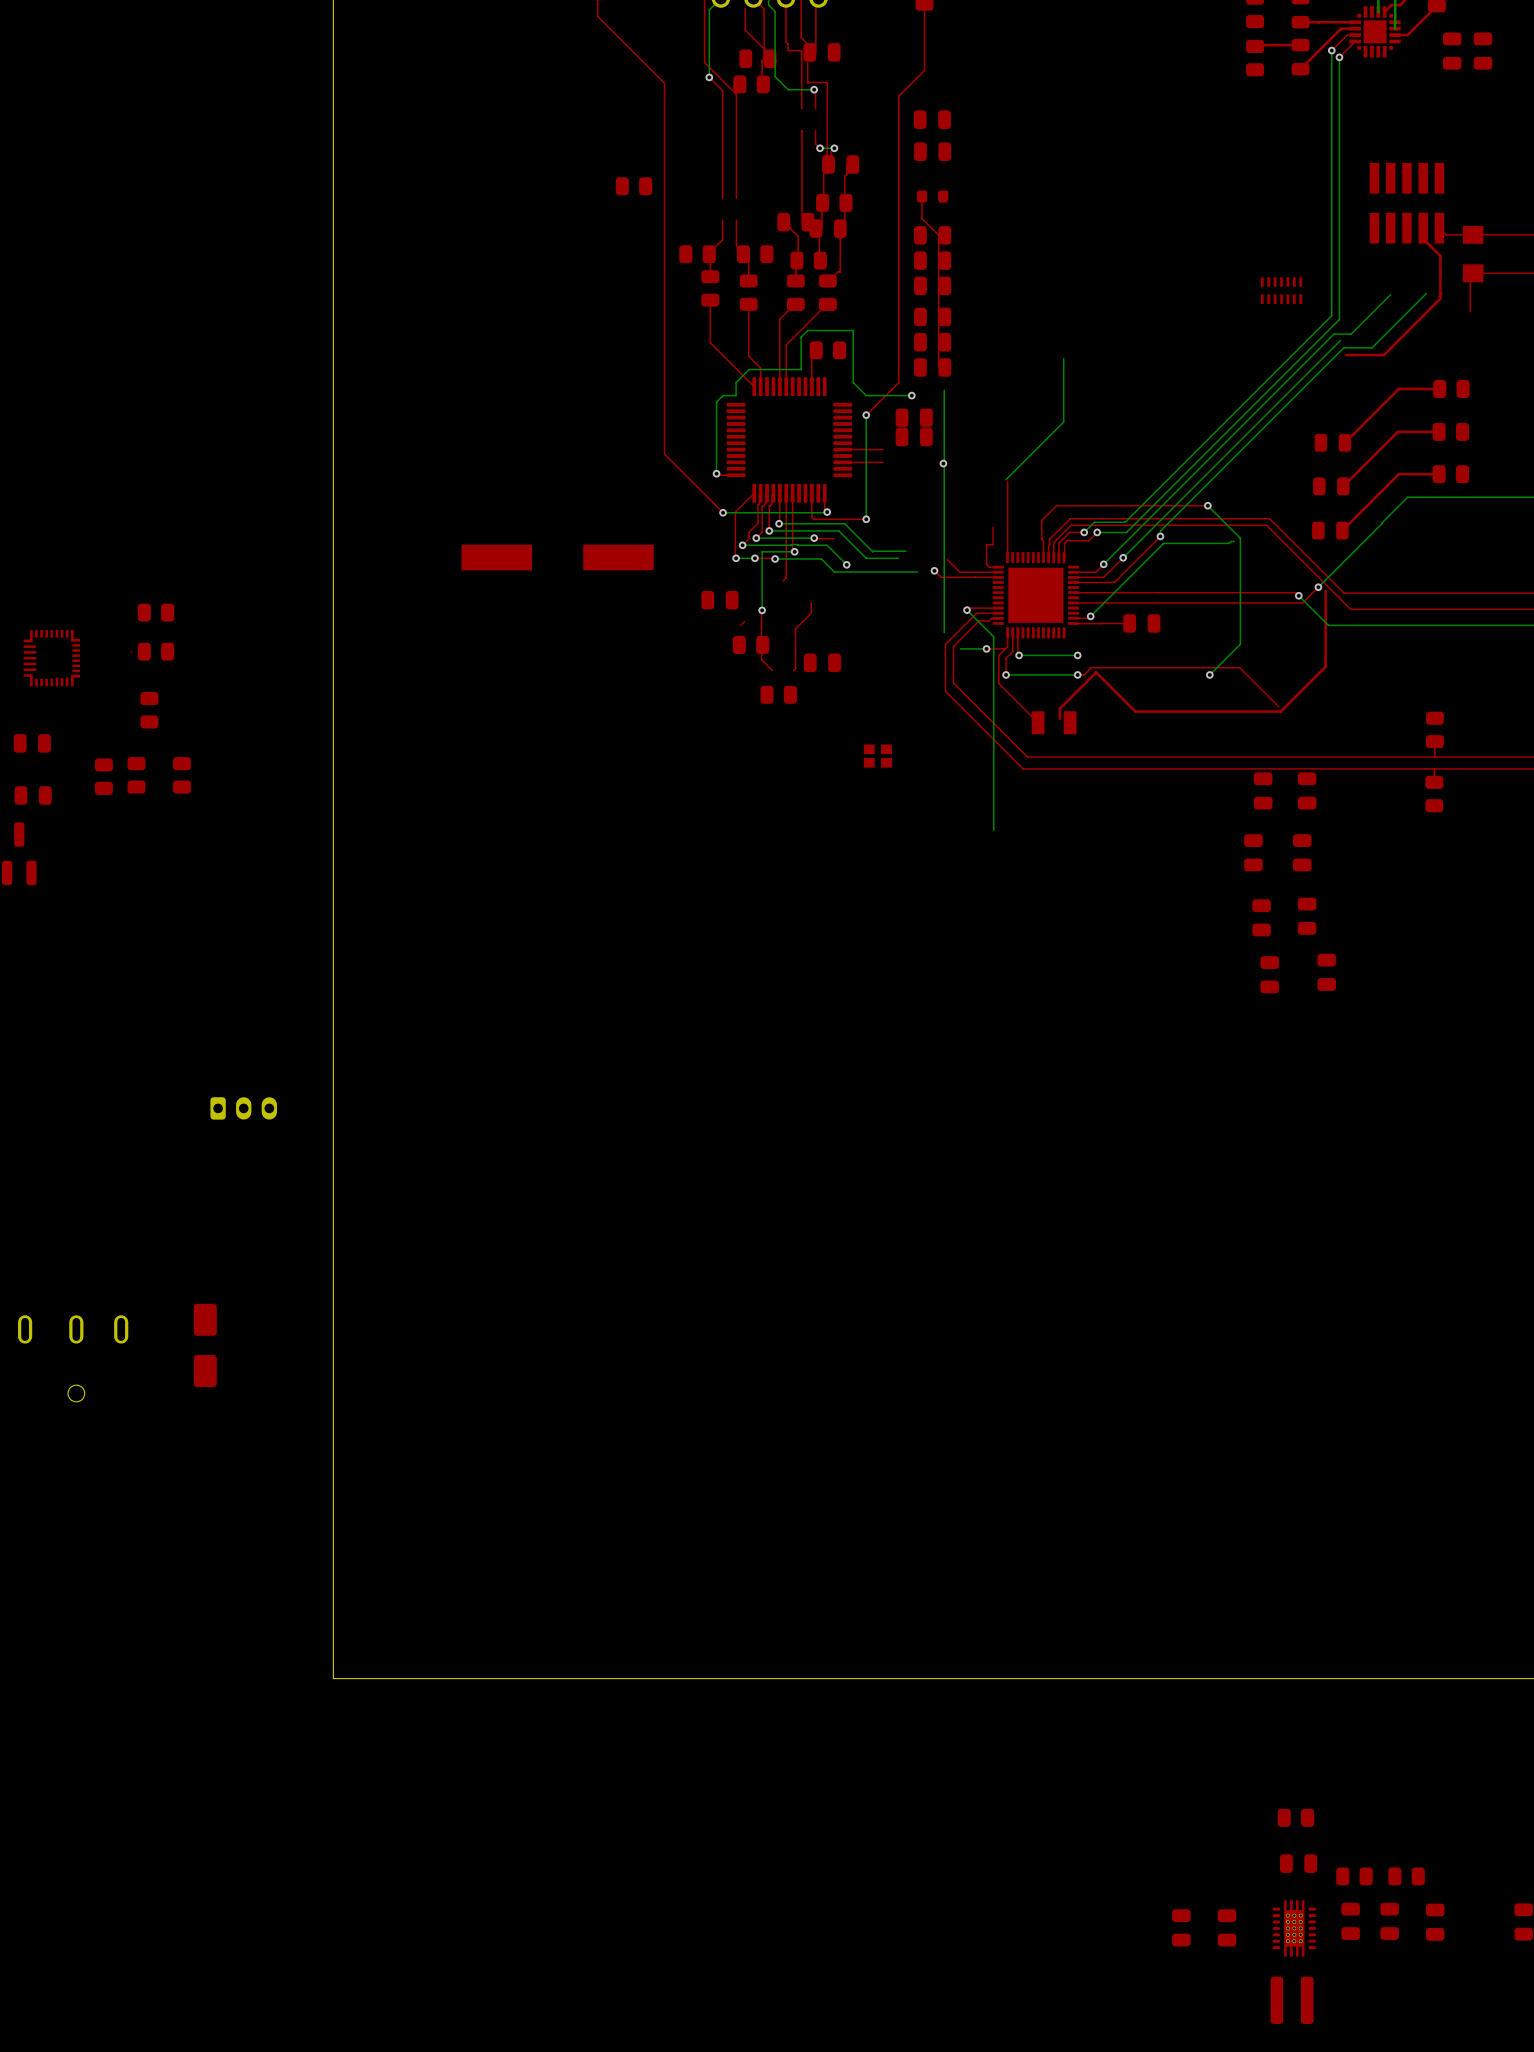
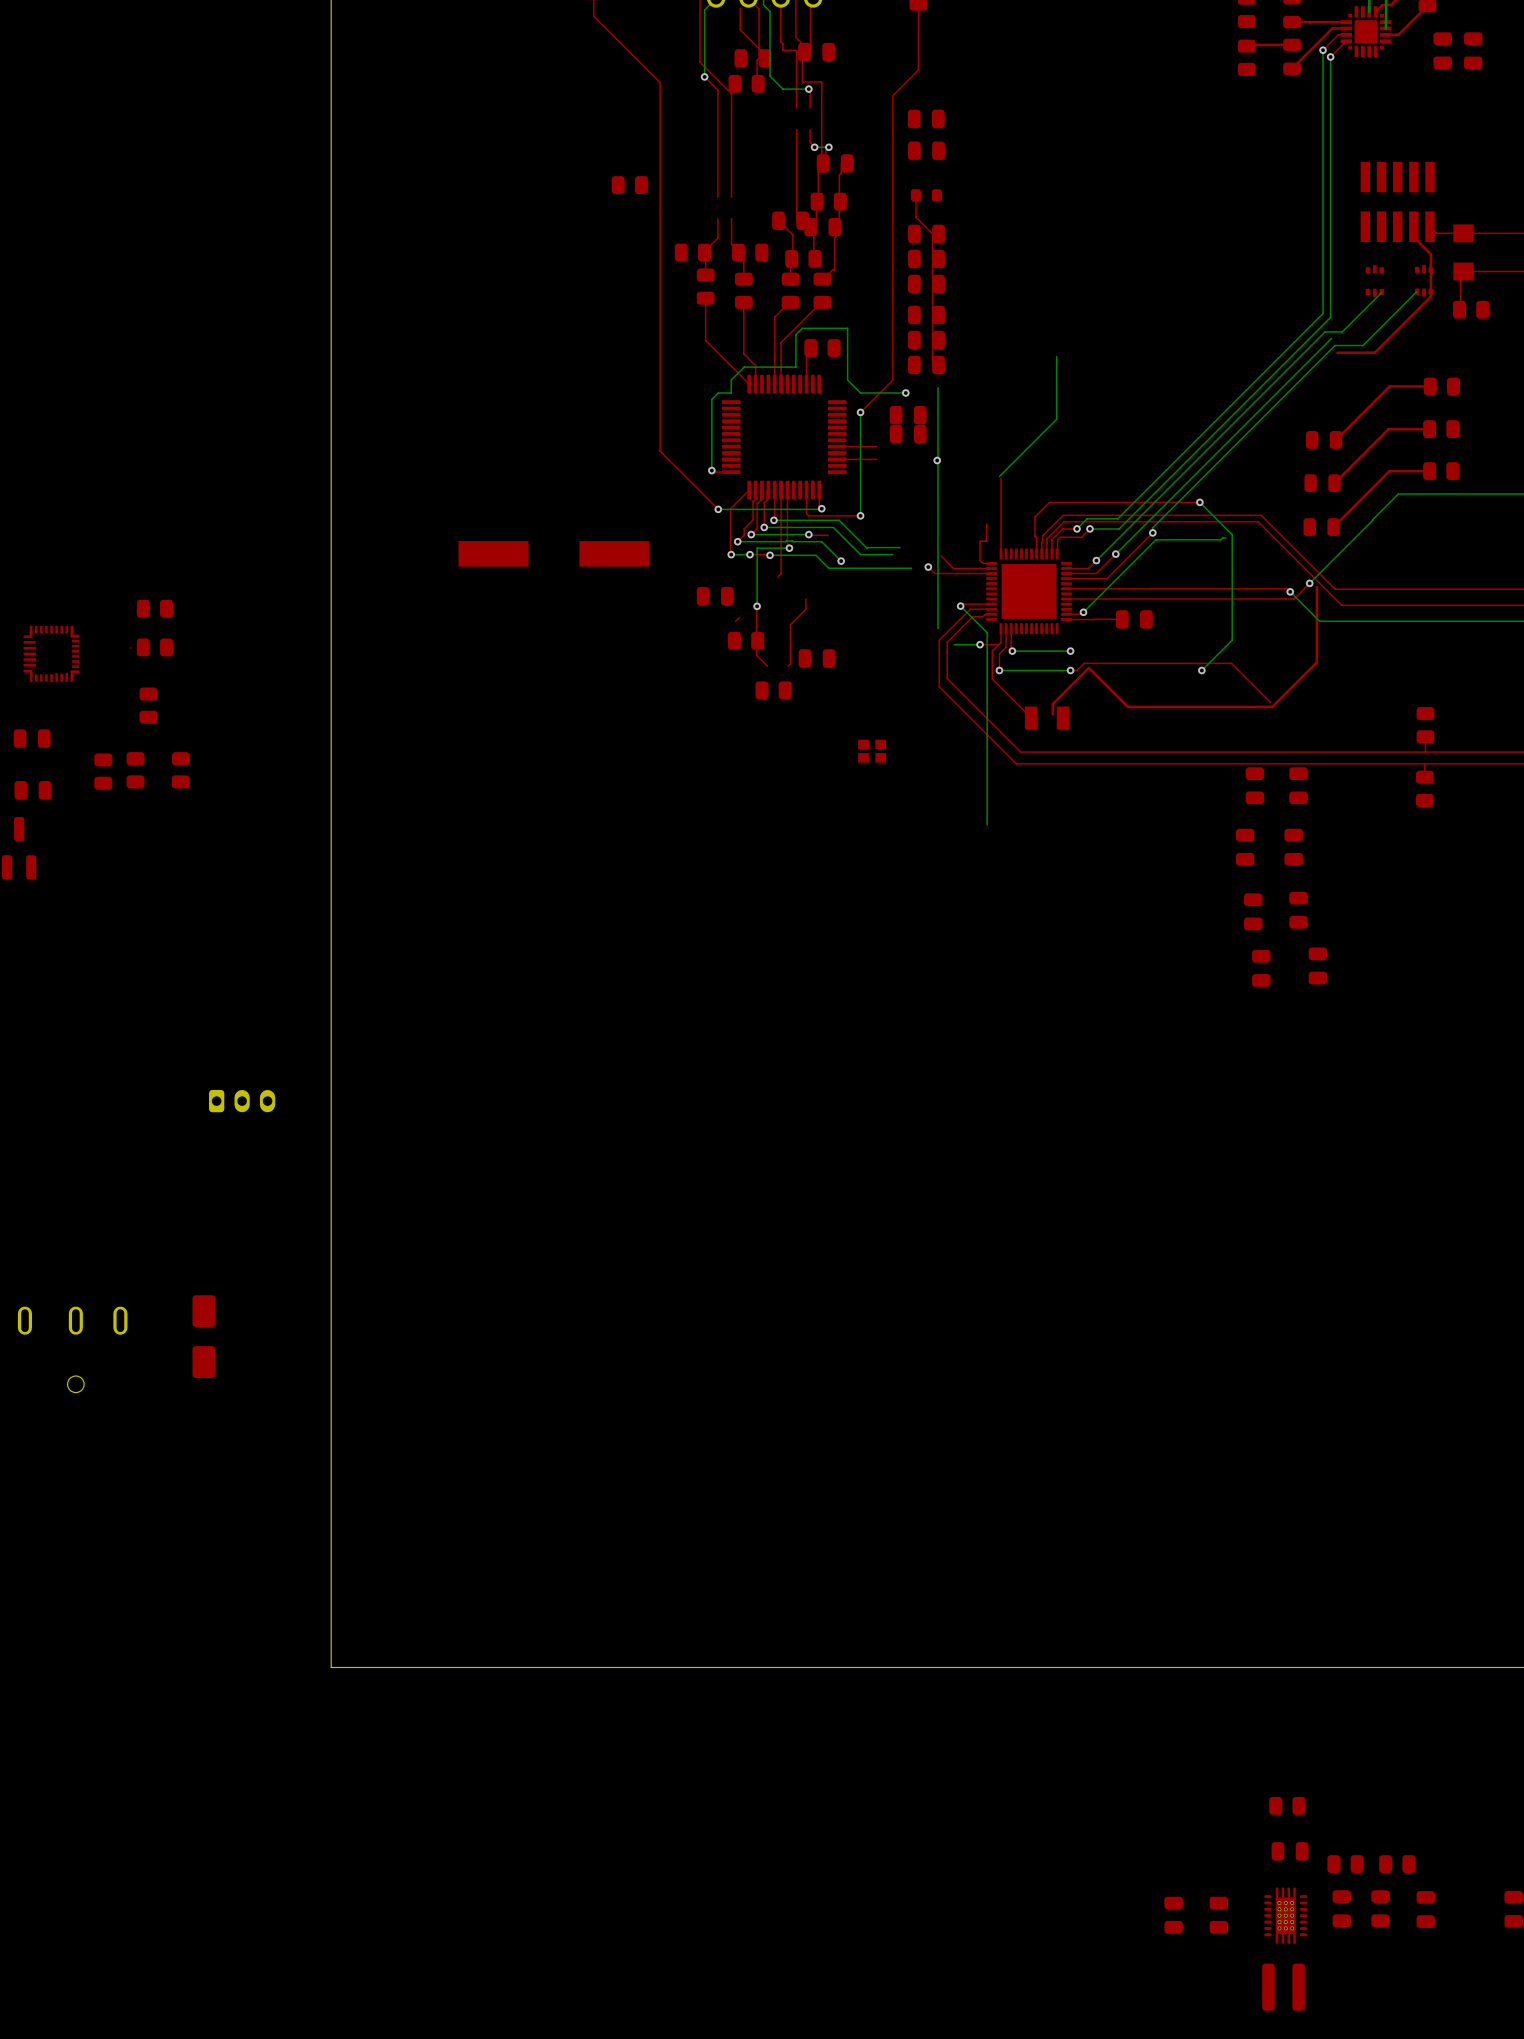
part: none -> (1374, 281)
part: none -> (1424, 280)
part: (1281, 290) -> none
part: none -> (1471, 309)

